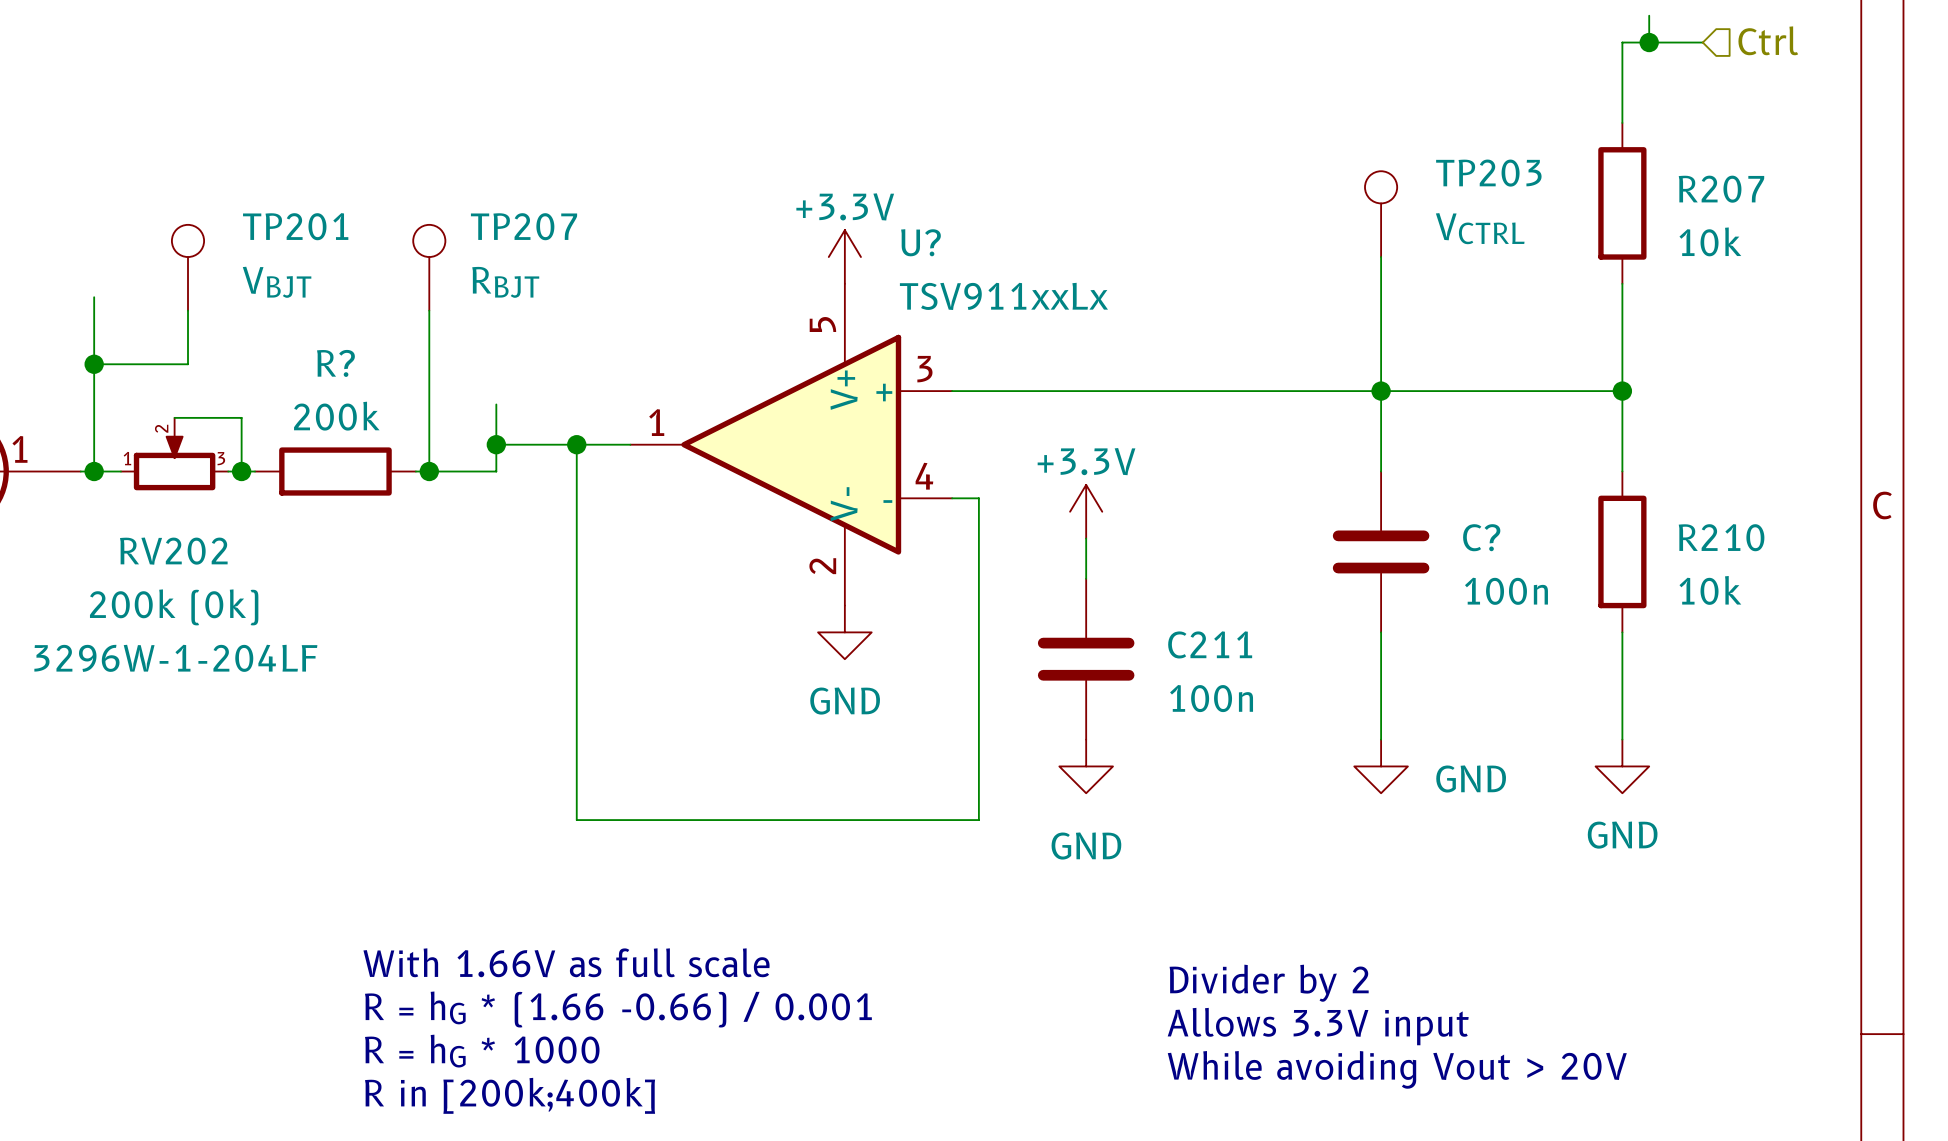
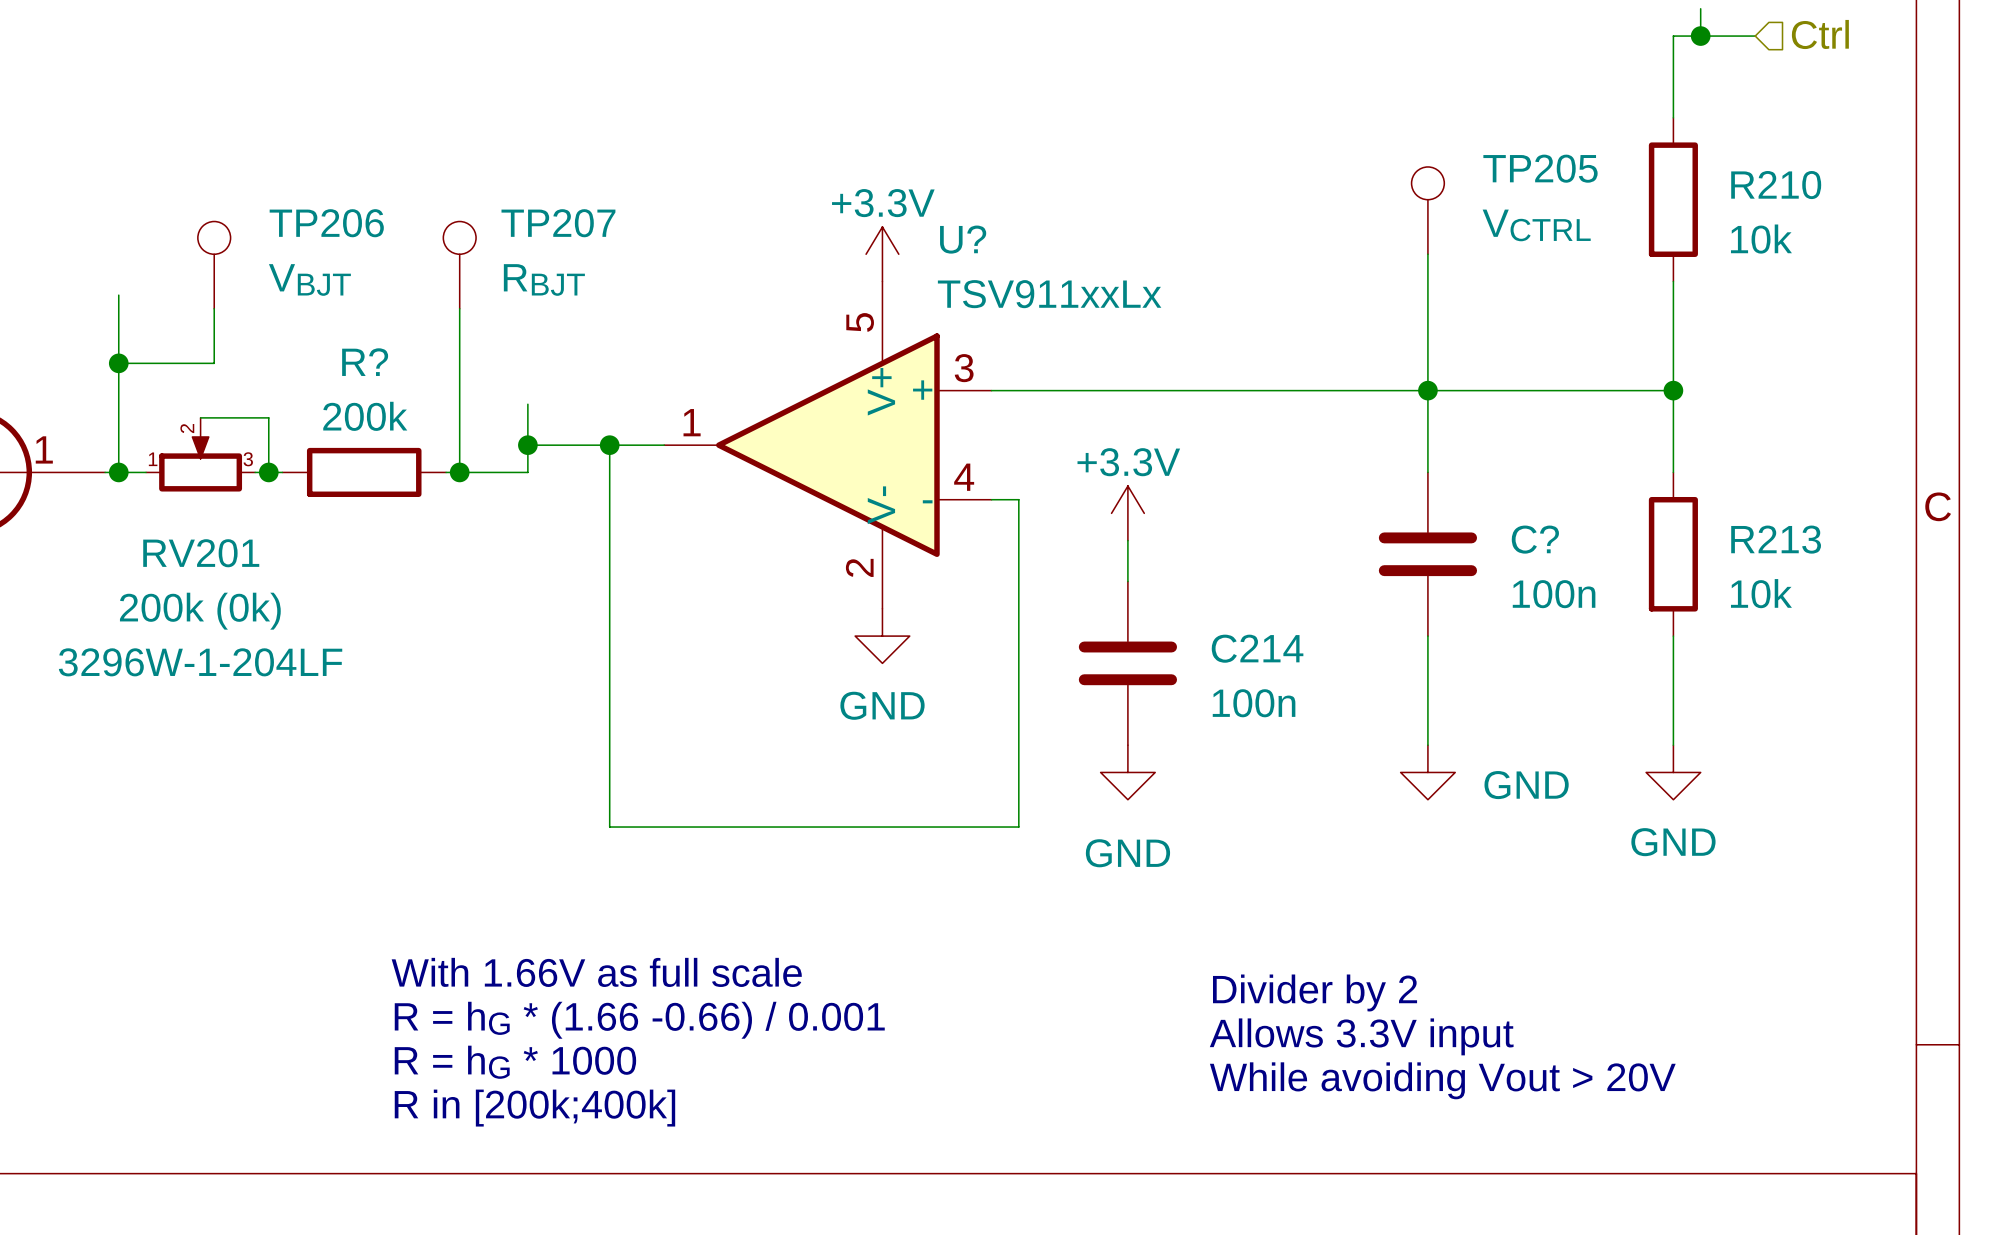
TP203 name: TP203 (1488, 173) -> TP205 (1540, 168)
R207 name: R207 (1721, 189) -> R210 (1776, 185)
TP201 name: TP201 (295, 226) -> TP206 (326, 223)
R210 name: R210 (1721, 537) -> R213 (1776, 539)
RV202 name: RV202 (173, 551) -> RV201 (201, 553)
C211 name: C211 (1210, 644) -> C214 (1257, 648)

